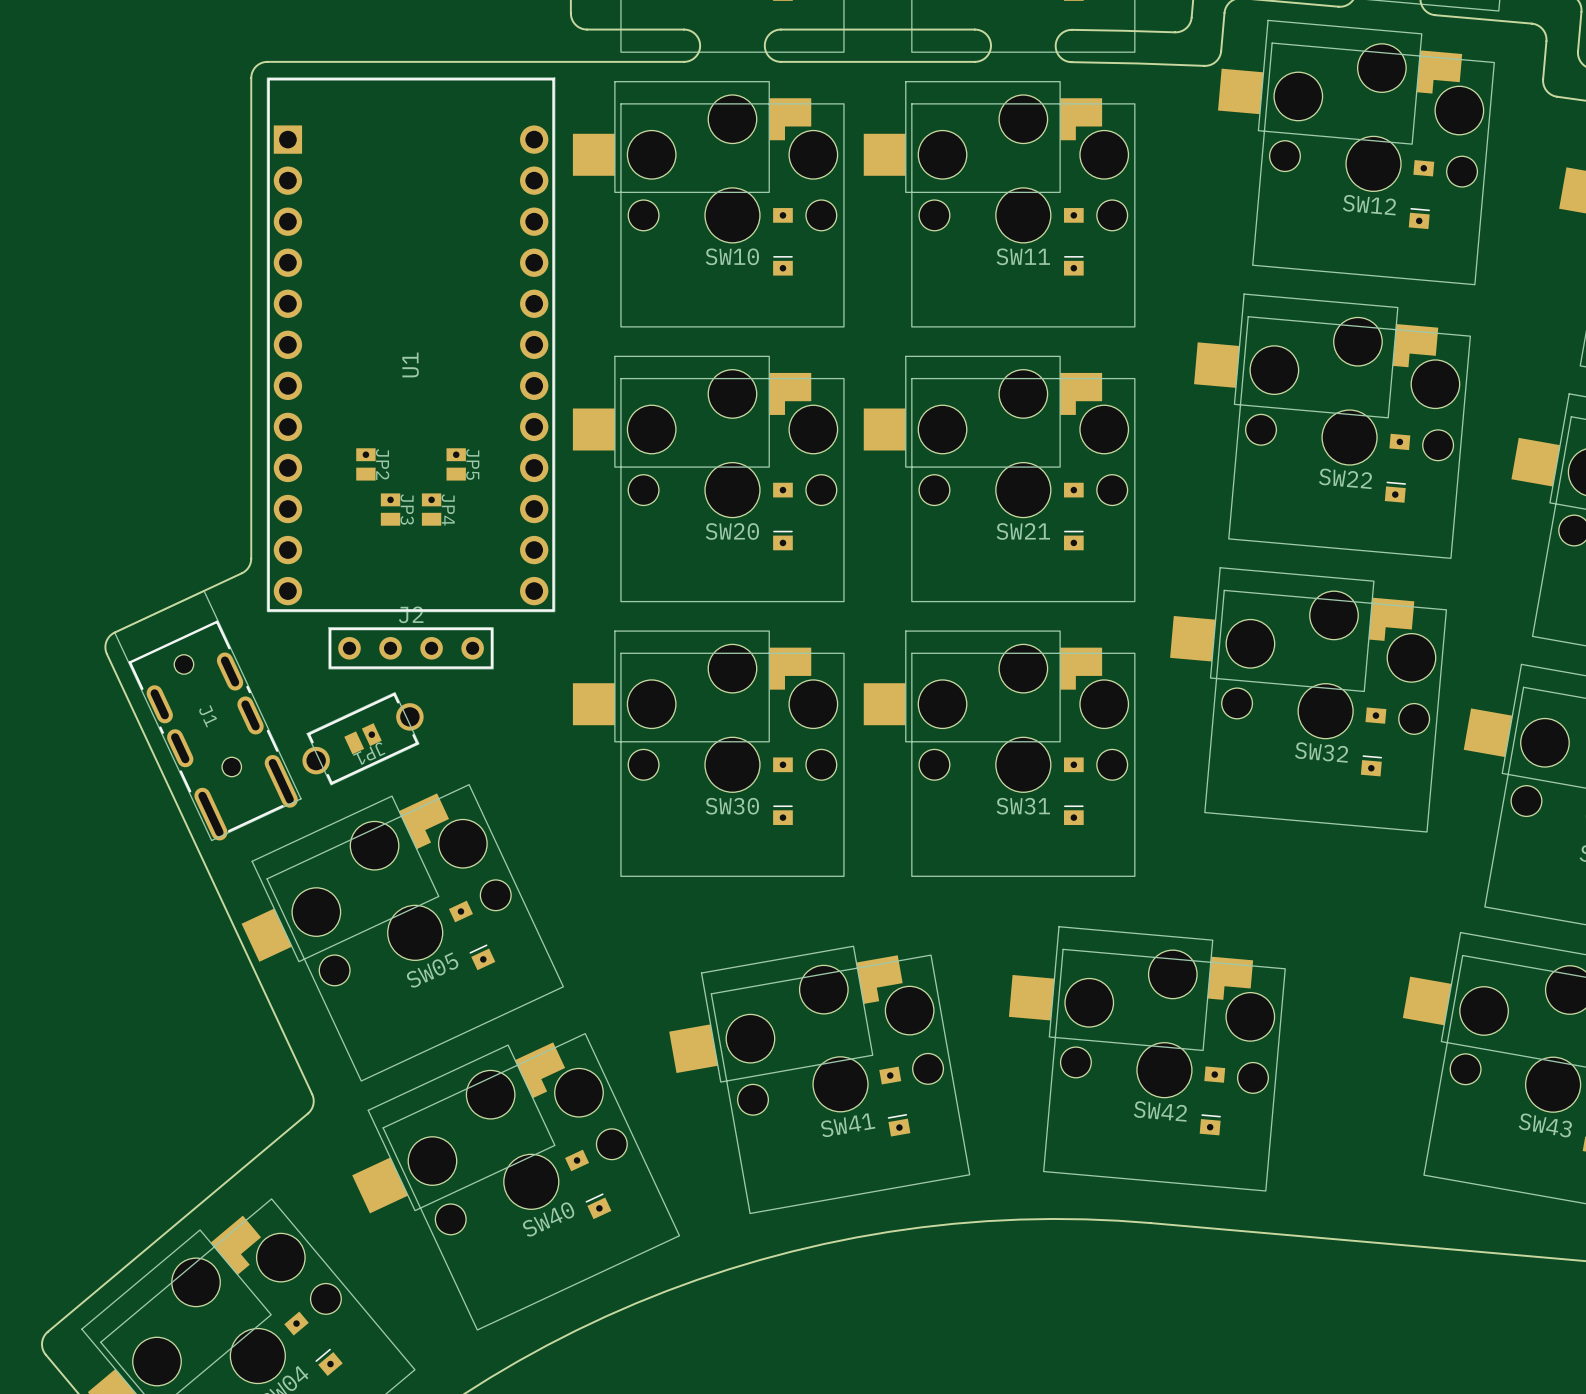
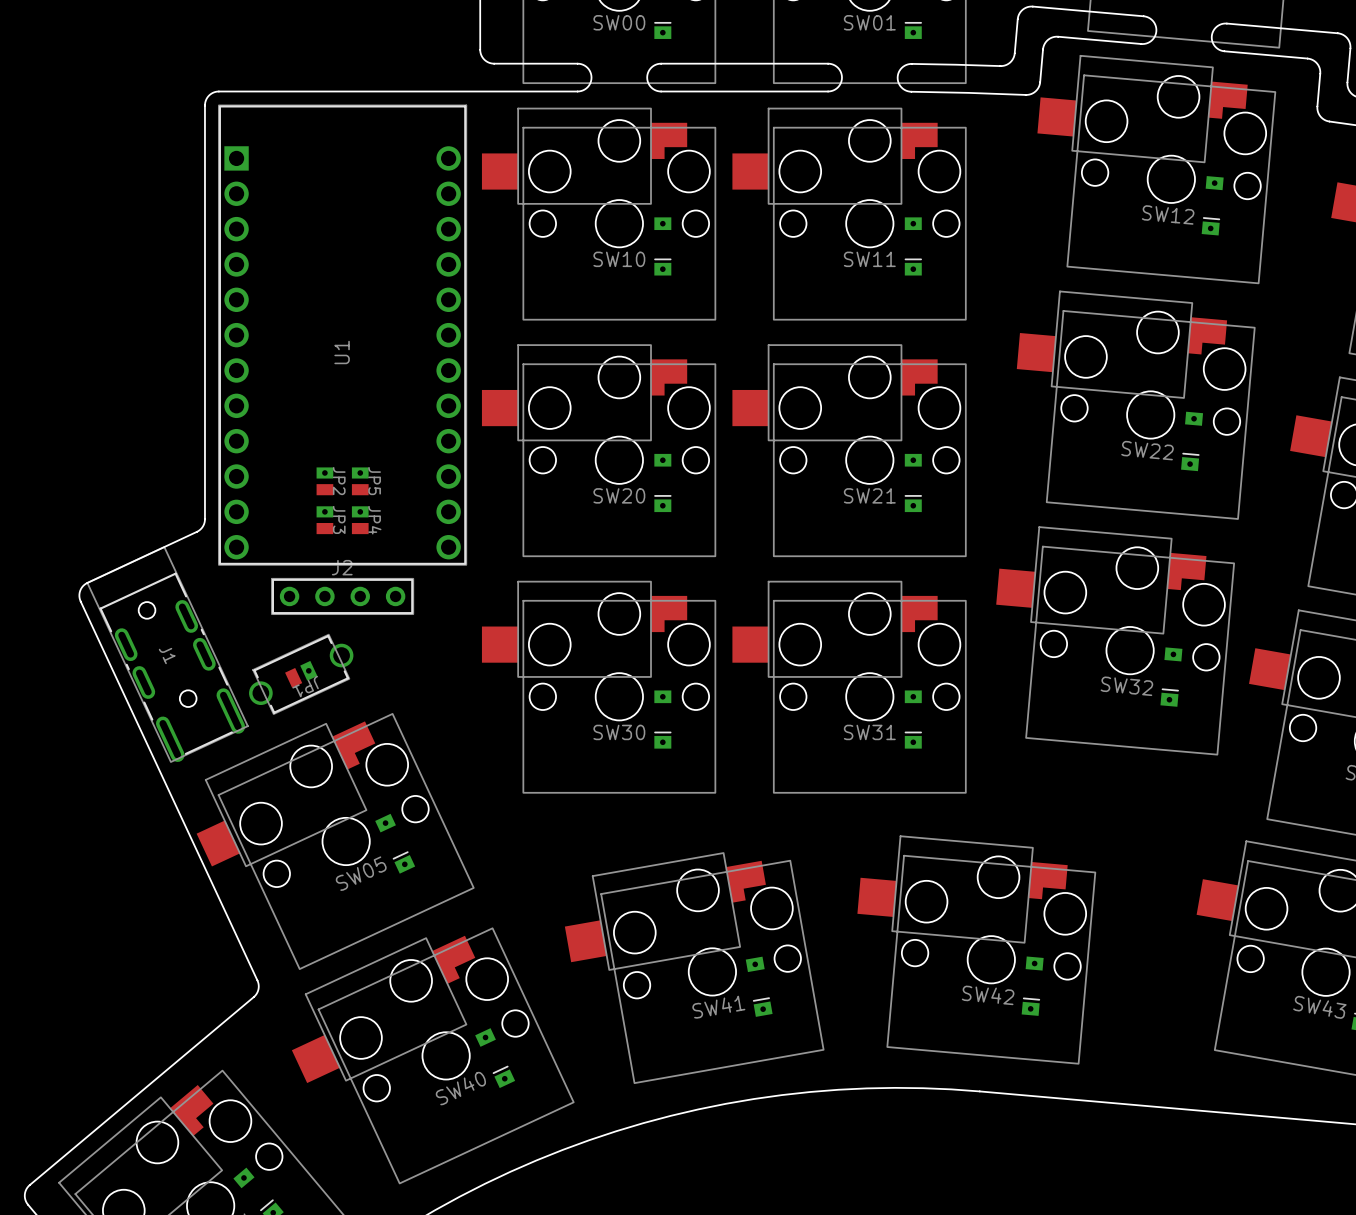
JP2 position: (365, 464) -> (324, 481)
JP5 position: (456, 464) -> (360, 481)
JP3 position: (390, 509) -> (324, 520)
JP4 position: (431, 509) -> (360, 520)

